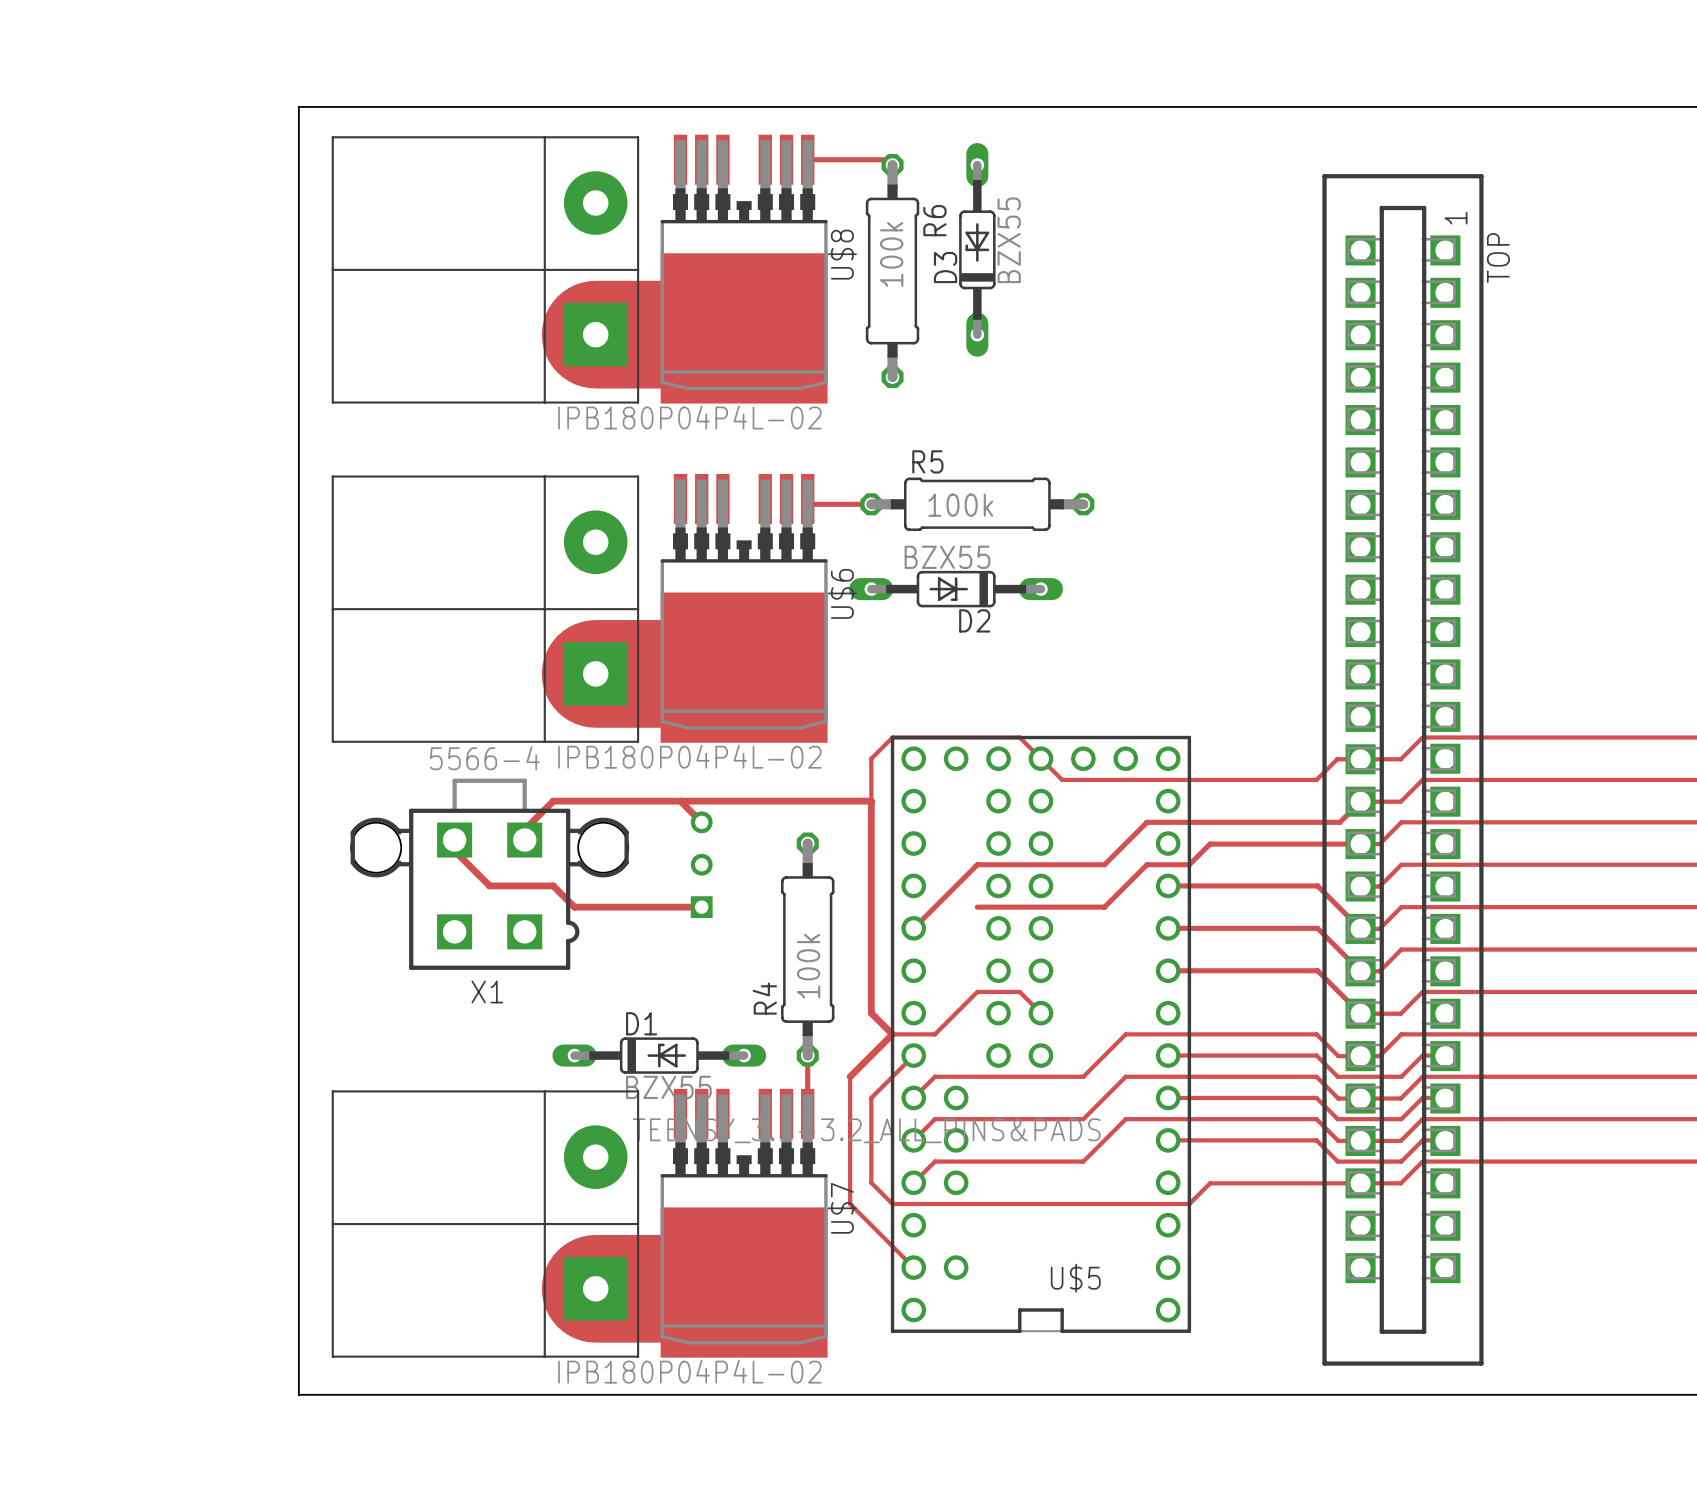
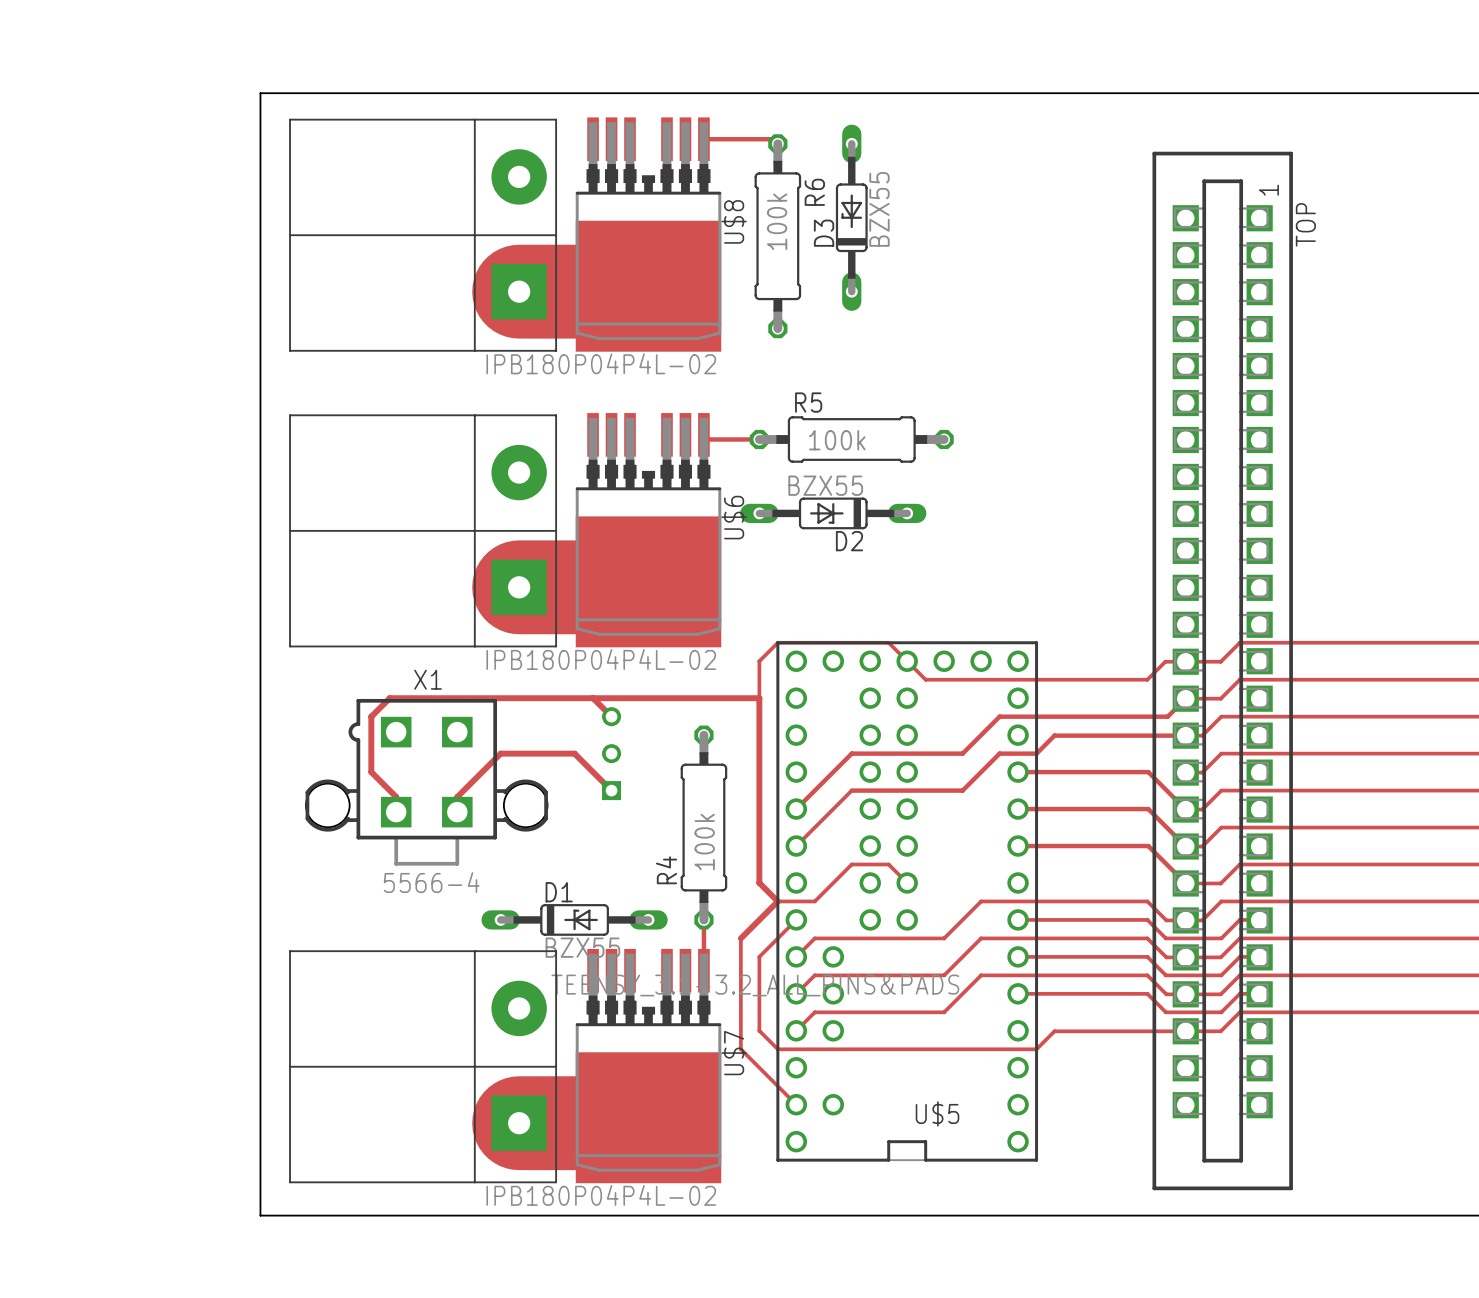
track: (553, 801) (524, 829) (524, 840) -> (482, 698) (389, 698) (371, 716) (371, 772) (396, 796) (396, 812)
track: (454, 840) (454, 850) (489, 885) (553, 885) (574, 907) (701, 907) -> (457, 812) (457, 796) (500, 753) (574, 753) (611, 790)
X1 rotation: 0° (489, 874) -> 180° (426, 782)
track: none -> (851, 790) (796, 846)

